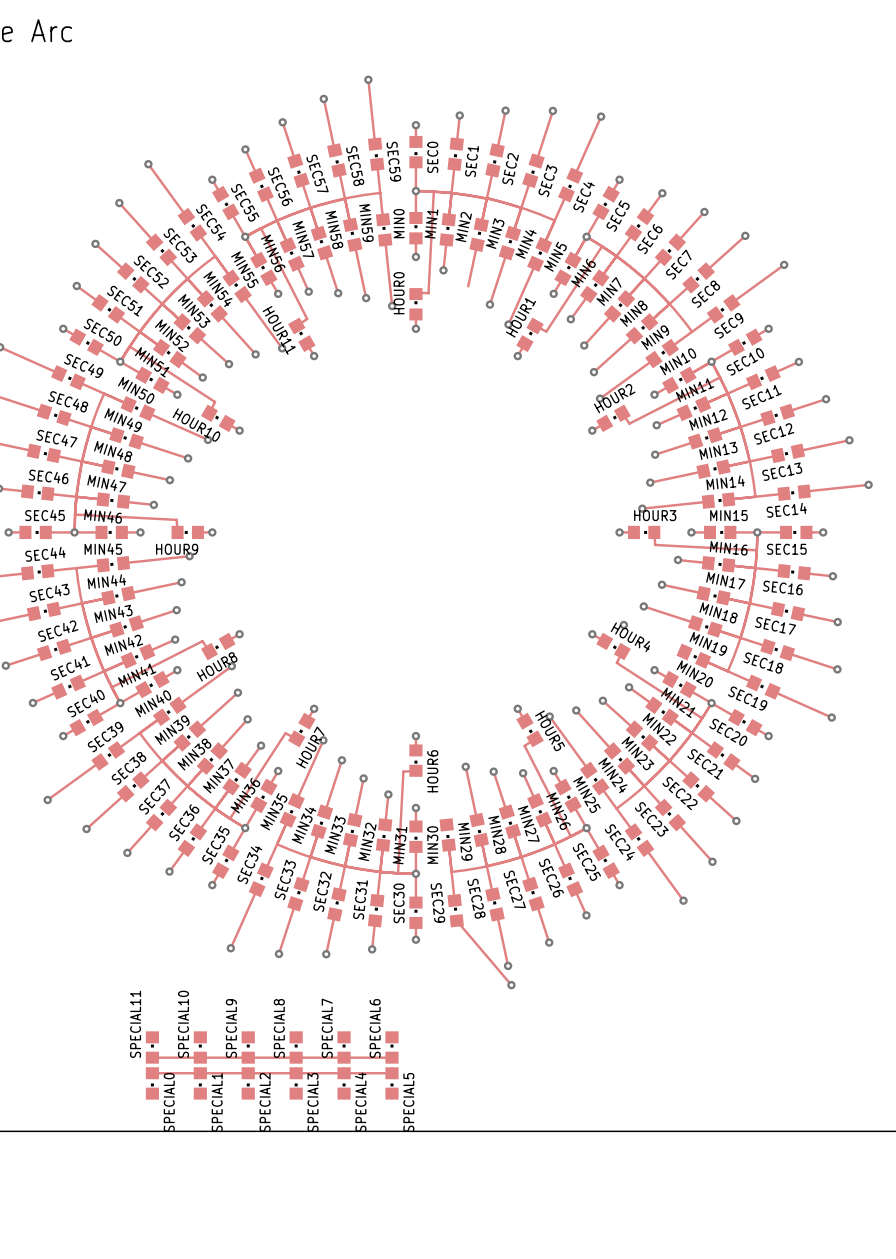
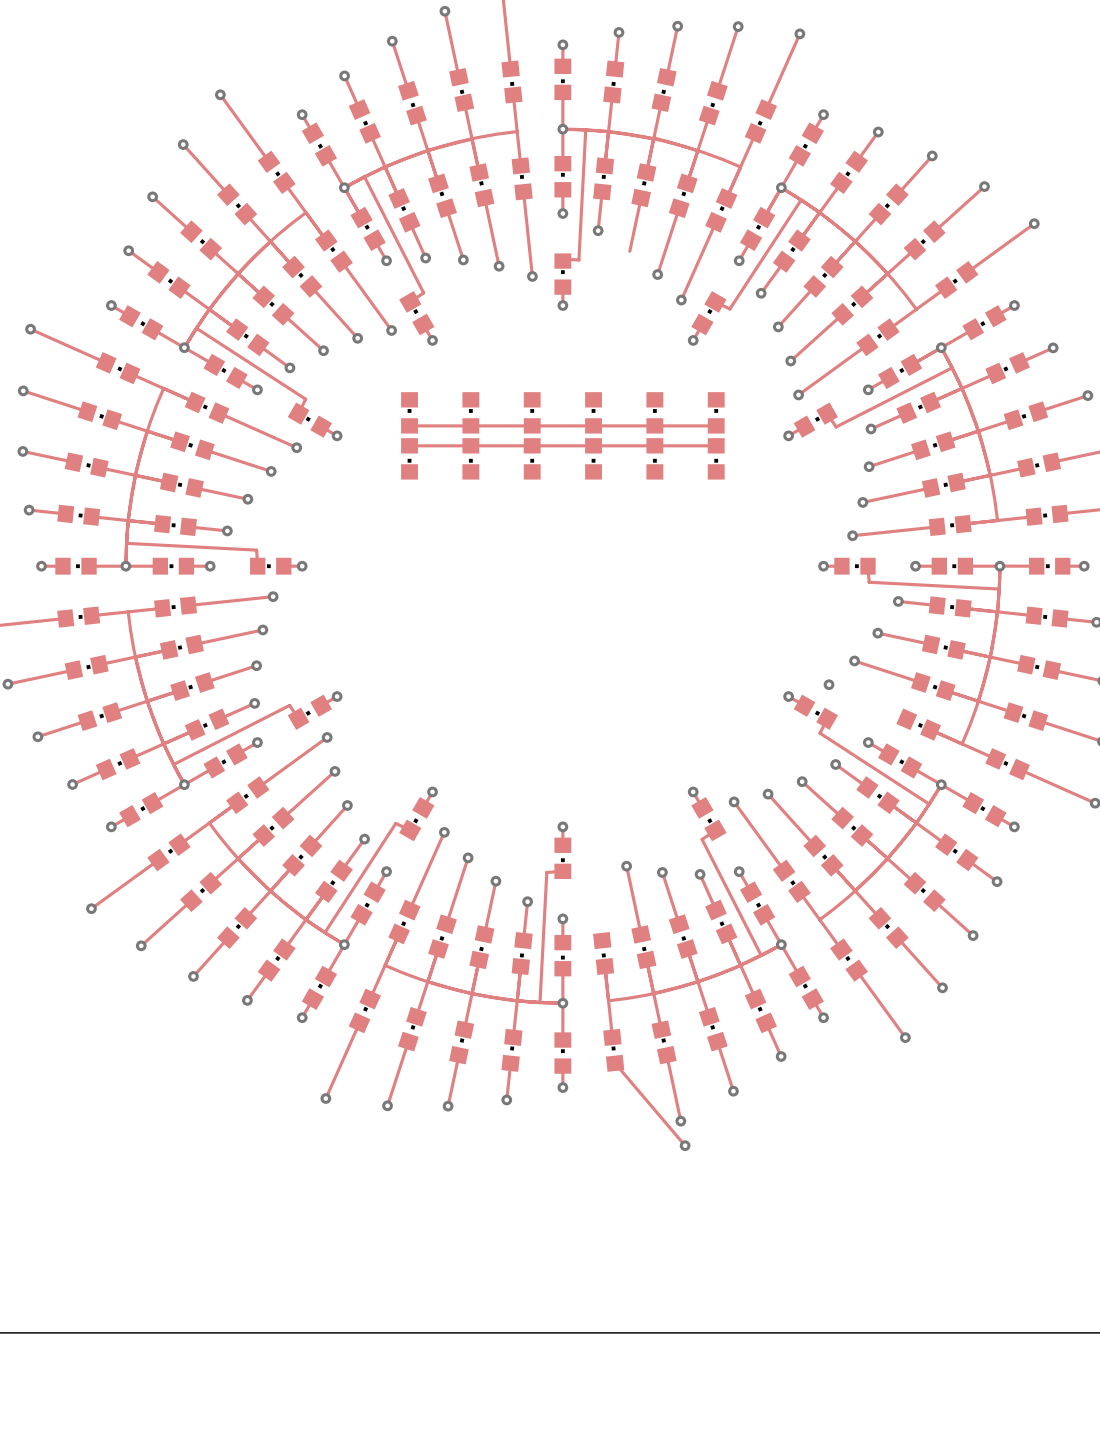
SEC0 name: SEC0 (432, 157) -> none
SEC59 name: SEC59 (393, 161) -> none
SEC1 name: SEC1 (471, 161) -> none
SEC58 name: SEC58 (355, 166) -> none
SEC2 name: SEC2 (510, 169) -> none
SEC57 name: SEC57 (317, 173) -> none
SEC3 name: SEC3 (547, 180) -> none
SEC56 name: SEC56 (280, 186) -> none
SEC4 name: SEC4 (584, 197) -> none
SEC55 name: SEC55 (245, 202) -> none
SEC5 name: SEC5 (618, 216) -> none
SEC54 name: SEC54 (211, 222) -> none
MIN59 name: MIN59 (366, 223) -> none
MIN0 name: MIN0 (399, 223) -> none
MIN1 name: MIN1 (431, 224) -> none
MIN2 name: MIN2 (463, 227) -> none
MIN58 name: MIN58 (334, 229) -> none
MIN3 name: MIN3 (495, 233) -> none
MIN57 name: MIN57 (303, 239) -> none
SEC6 name: SEC6 (650, 239) -> none
MIN4 name: MIN4 (526, 244) -> none
SEC53 name: SEC53 (180, 245) -> none
MIN56 name: MIN56 (273, 253) -> none
MIN5 name: MIN5 (555, 256) -> none
SEC7 name: SEC7 (678, 264) -> none
MIN55 name: MIN55 (244, 269) -> none
SEC52 name: SEC52 (151, 272) -> none
MIN6 name: MIN6 (583, 273) -> none
MIN54 name: MIN54 (217, 289) -> none
MIN7 name: MIN7 (608, 291) -> none
HOUR0 name: HOUR0 (399, 293) -> none
SEC8 name: SEC8 (705, 294) -> none
SEC51 name: SEC51 (124, 301) -> none
MIN53 name: MIN53 (194, 310) -> none
MIN8 name: MIN8 (633, 313) -> none
HOUR1 name: HOUR1 (520, 317) -> none
SEC9 name: SEC9 (728, 325) -> none
HOUR11 name: HOUR11 (279, 330) -> none
SEC50 name: SEC50 (102, 332) -> none
MIN52 name: MIN52 (171, 335) -> none
MIN9 name: MIN9 (655, 337) -> none
MIN10 name: MIN10 (678, 361) -> none
SEC10 name: SEC10 (745, 361) -> none
MIN51 name: MIN51 (152, 362) -> none
SEC49 name: SEC49 (83, 366) -> none
MIN50 name: MIN50 (136, 390) -> none
MIN11 name: MIN11 (695, 390) -> none
SEC11 name: SEC11 (762, 397) -> none
HOUR2 name: HOUR2 (614, 398) -> none
SEC48 name: SEC48 (68, 401) -> none
part: none -> (409, 412)
part: none -> (470, 412)
part: none -> (532, 412)
part: none -> (593, 412)
part: none -> (654, 412)
part: none -> (716, 412)
MIN12 name: MIN12 (708, 419) -> none
MIN49 name: MIN49 (123, 420) -> none
track: none -> (409, 425) (716, 425)
HOUR10 name: HOUR10 (196, 425) -> none
SEC12 name: SEC12 (774, 433) -> none
SEC47 name: SEC47 (56, 438) -> none
track: none -> (409, 445) (716, 445)
part: none -> (409, 458)
part: none -> (470, 458)
part: none -> (532, 458)
part: none -> (593, 458)
part: none -> (654, 458)
part: none -> (716, 458)
MIN13 name: MIN13 (718, 450) -> none
MIN48 name: MIN48 (113, 451) -> none
SEC13 name: SEC13 (782, 471) -> none
SEC46 name: SEC46 (48, 476) -> none
MIN14 name: MIN14 (725, 482) -> none
MIN47 name: MIN47 (106, 483) -> none
SEC14 name: SEC14 (786, 510) -> none
SEC45 name: SEC45 (45, 515) -> none
HOUR3 name: HOUR3 (655, 515) -> none
MIN15 name: MIN15 (728, 515) -> none
MIN46 name: MIN46 (103, 516) -> none
MIN16 name: MIN16 (728, 548) -> none
MIN45 name: MIN45 (103, 549) -> none
HOUR9 name: HOUR9 (177, 549) -> none
SEC15 name: SEC15 (786, 549) -> none
SEC44 name: SEC44 (45, 554) -> none
MIN17 name: MIN17 (725, 580) -> none
MIN44 name: MIN44 (106, 581) -> none
SEC16 name: SEC16 (782, 587) -> none
SEC43 name: SEC43 (49, 592) -> none
MIN18 name: MIN18 (718, 612) -> none
MIN43 name: MIN43 (113, 613) -> none
SEC17 name: SEC17 (775, 625) -> none
SEC42 name: SEC42 (58, 631) -> none
HOUR4 name: HOUR4 (630, 637) -> none
MIN19 name: MIN19 (708, 643) -> none
MIN42 name: MIN42 (123, 645) -> none
SEC18 name: SEC18 (763, 663) -> none
HOUR8 name: HOUR8 (217, 666) -> none
SEC41 name: SEC41 (70, 668) -> none
MIN20 name: MIN20 (694, 673) -> none
MIN41 name: MIN41 (137, 675) -> none
SEC19 name: SEC19 (747, 698) -> none
MIN21 name: MIN21 (678, 702) -> none
SEC40 name: SEC40 (86, 703) -> none
MIN40 name: MIN40 (153, 703) -> none
MIN22 name: MIN22 (659, 729) -> none
MIN39 name: MIN39 (172, 730) -> none
HOUR5 name: HOUR5 (550, 730) -> none
SEC20 name: SEC20 (728, 732) -> none
SEC39 name: SEC39 (105, 737) -> none
HOUR7 name: HOUR7 (310, 747) -> none
MIN23 name: MIN23 (637, 753) -> none
MIN38 name: MIN38 (194, 754) -> none
SEC21 name: SEC21 (705, 764) -> none
SEC38 name: SEC38 (129, 768) -> none
HOUR6 name: HOUR6 (432, 771) -> none
MIN37 name: MIN37 (218, 775) -> none
MIN24 name: MIN24 (612, 775) -> none
SEC22 name: SEC22 (680, 793) -> none
MIN25 name: MIN25 (586, 794) -> none
MIN36 name: MIN36 (245, 795) -> none
SEC37 name: SEC37 (154, 796) -> none
MIN35 name: MIN35 (273, 811) -> none
MIN26 name: MIN26 (558, 811) -> none
SEC23 name: SEC23 (651, 819) -> none
SEC36 name: SEC36 (184, 822) -> none
MIN27 name: MIN27 (528, 823) -> none
MIN34 name: MIN34 (304, 825) -> none
MIN33 name: MIN33 (335, 834) -> none
MIN28 name: MIN28 (497, 834) -> none
MIN32 name: MIN32 (367, 841) -> none
MIN29 name: MIN29 (465, 841) -> none
SEC24 name: SEC24 (619, 842) -> none
SEC35 name: SEC35 (215, 845) -> none
MIN31 name: MIN31 (400, 845) -> none
MIN30 name: MIN30 (432, 845) -> none
SEC25 name: SEC25 (586, 862) -> none
SEC34 name: SEC34 (249, 865) -> none
SEC26 name: SEC26 (551, 878) -> none
SEC33 name: SEC33 (285, 879) -> none
SEC27 name: SEC27 (514, 889) -> none
SEC32 name: SEC32 (322, 891) -> none
SEC28 name: SEC28 (476, 898) -> none
SEC31 name: SEC31 (360, 900) -> none
SEC29 name: SEC29 (437, 902) -> none
SEC30 name: SEC30 (399, 903) -> none
SPECIAL11: (152, 1047) -> none
SPECIAL10: (200, 1047) -> none
SPECIAL9: (248, 1047) -> none
SPECIAL8: (296, 1047) -> none
SPECIAL7: (344, 1047) -> none
SPECIAL6: (391, 1047) -> none
track: (152, 1057) (391, 1057) -> none
track: (152, 1073) (391, 1073) -> none
SPECIAL0: (152, 1083) -> none
SPECIAL1: (200, 1083) -> none
SPECIAL2: (248, 1083) -> none
SPECIAL3: (296, 1083) -> none
SPECIAL4: (344, 1083) -> none
SPECIAL5: (391, 1083) -> none

